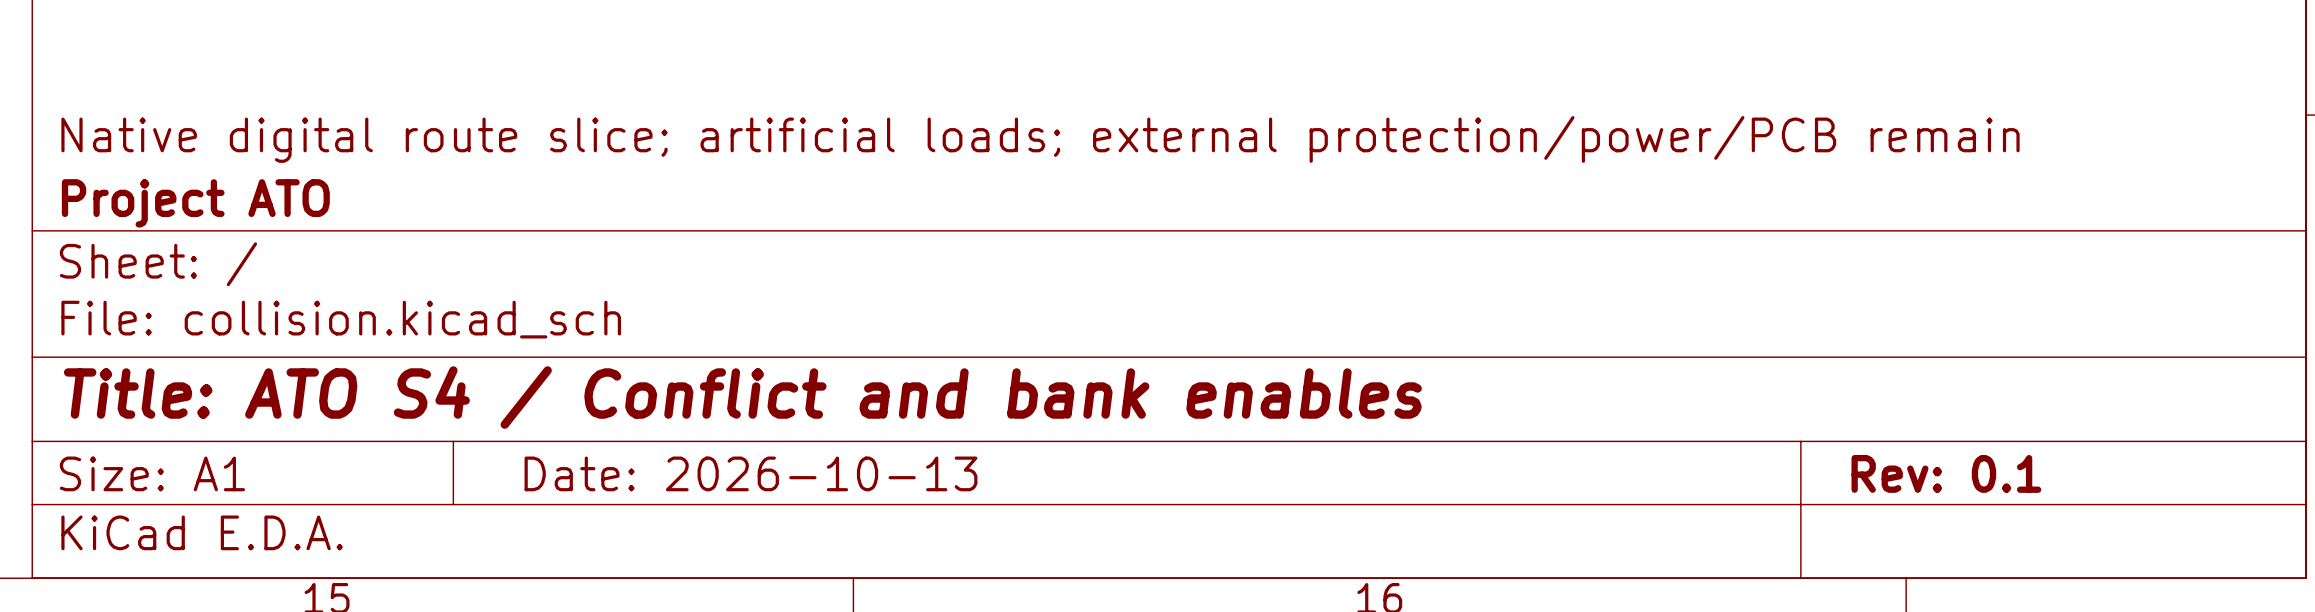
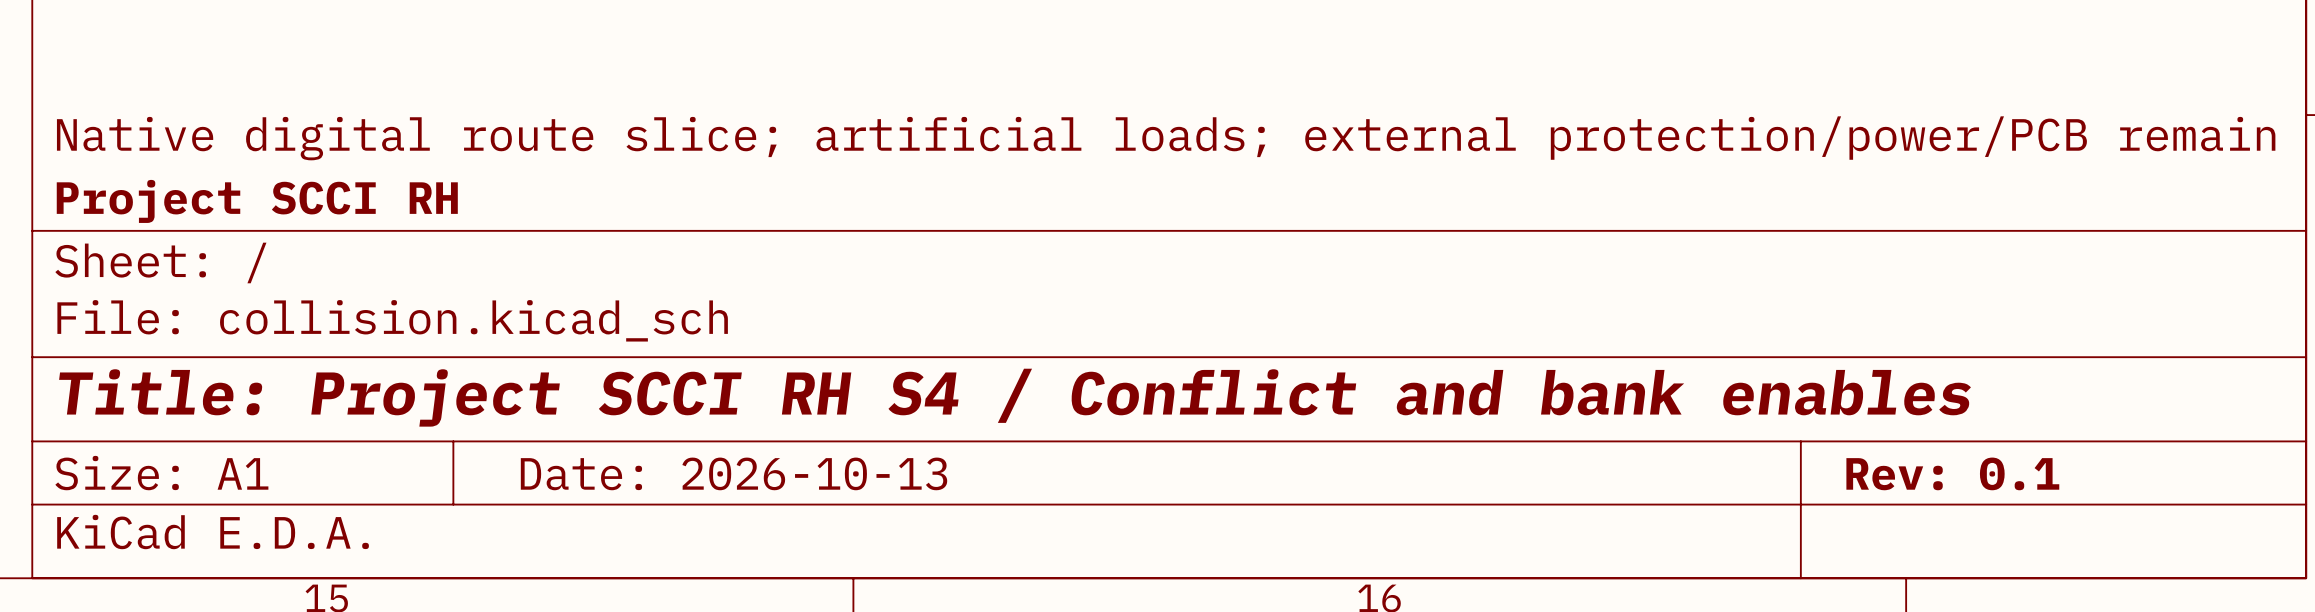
title block: Project ATO (195, 203) -> Project SCCI RH (257, 201)
title block: Title: ATO S4 / Conflict and bank enables (742, 397) -> Title: Project SCCI RH S4 / Conflict and bank enables (1015, 397)

